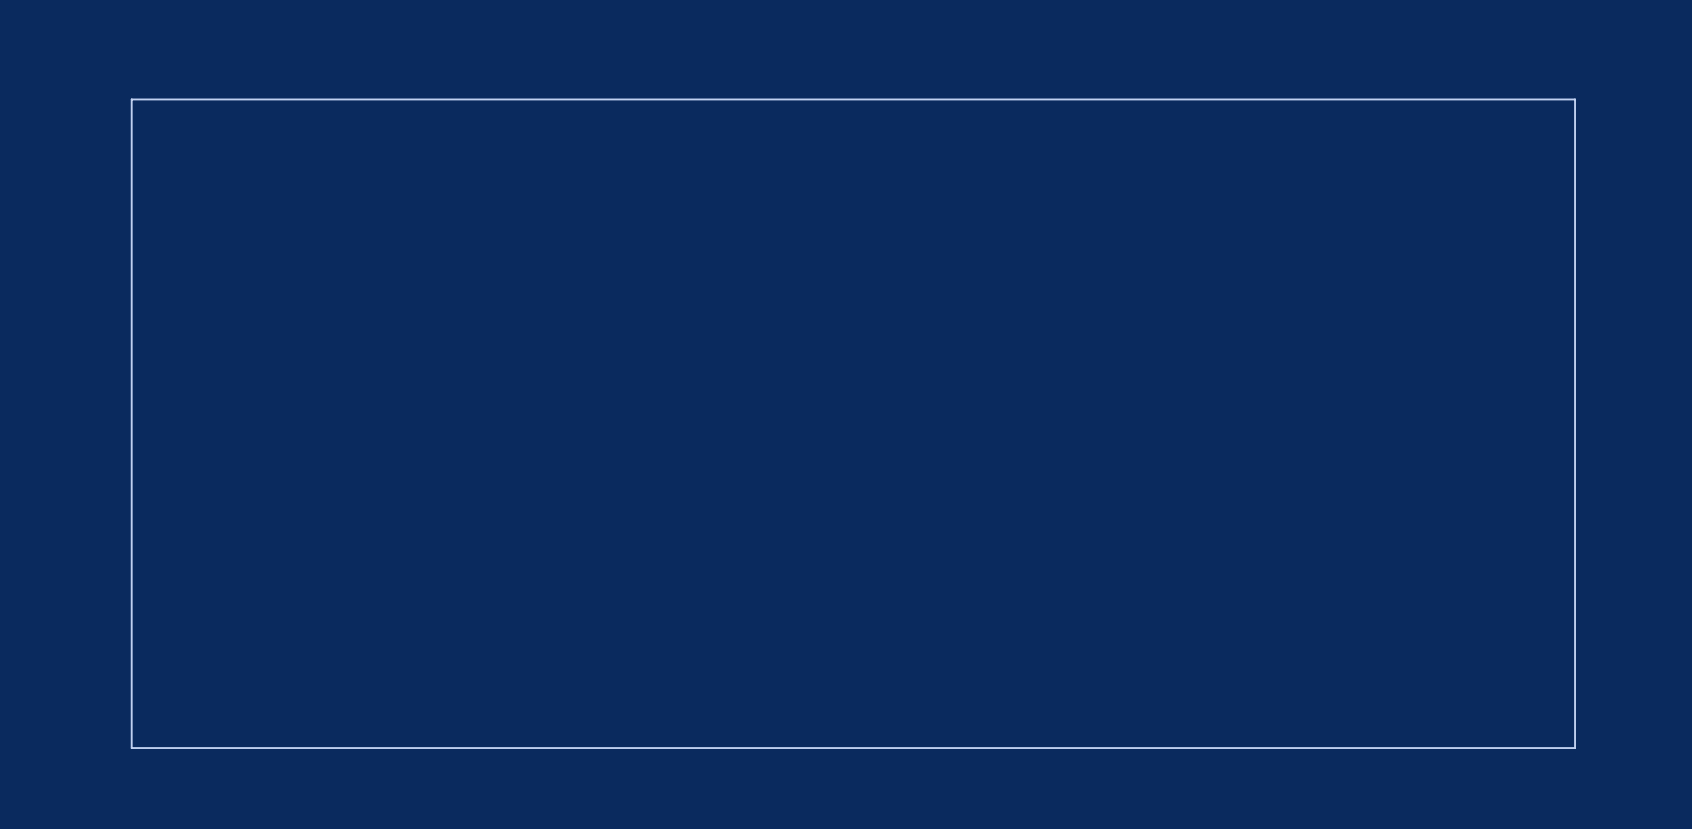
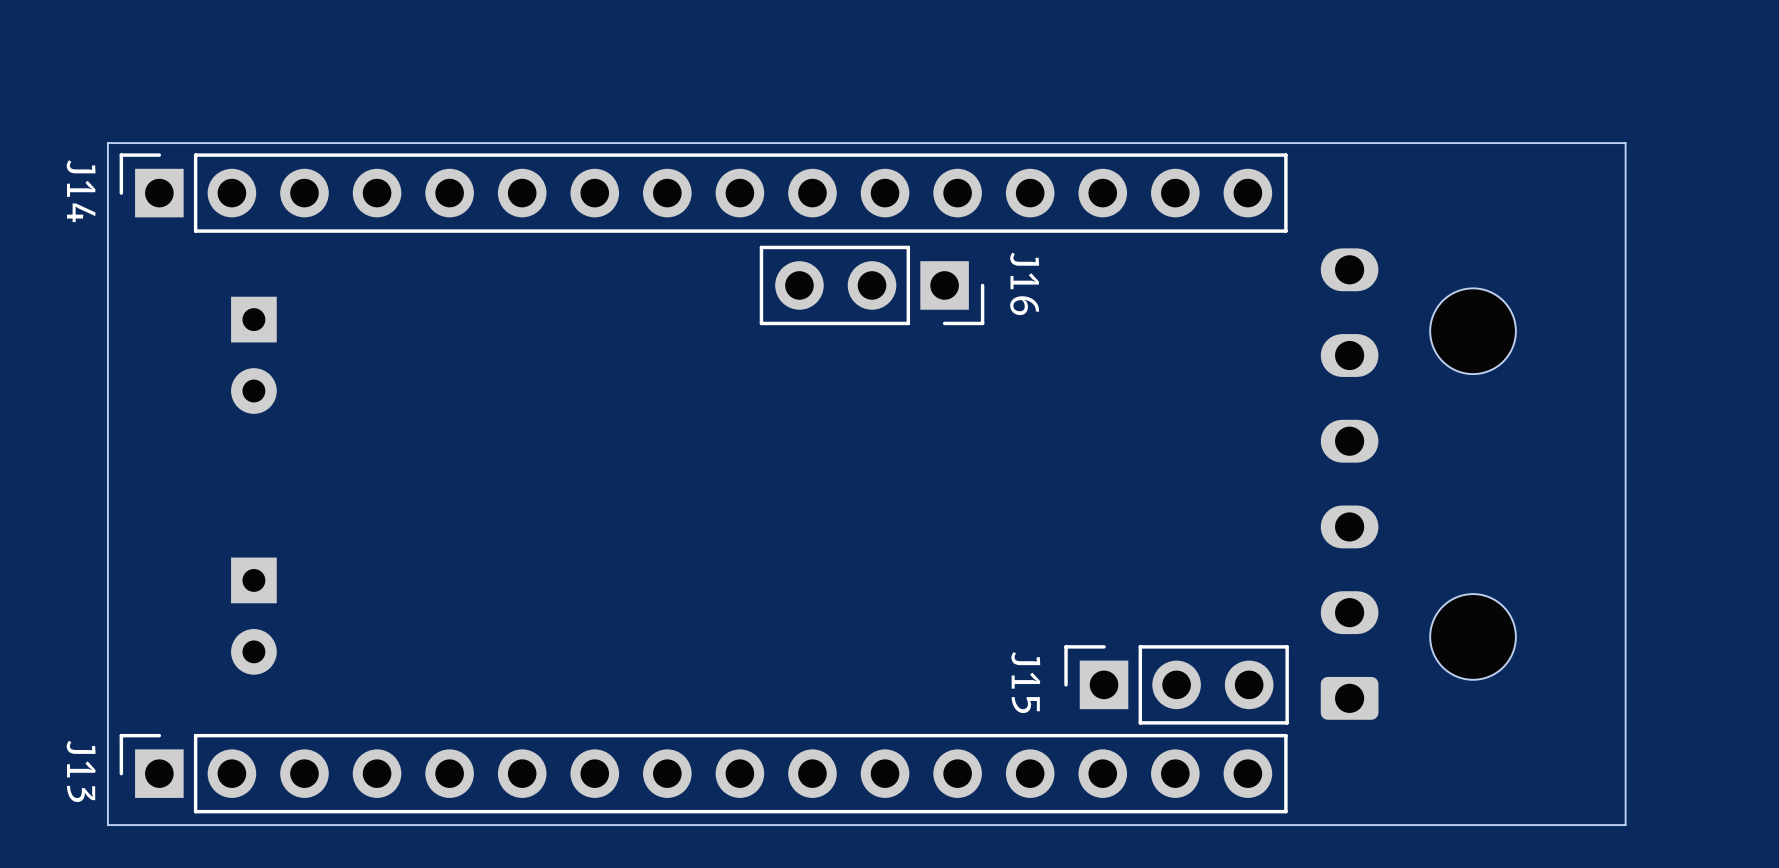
J14: none -> (703, 193)
J16: none -> (872, 285)
part: none -> (253, 355)
part: none -> (1418, 484)
part: none -> (253, 616)
J15: none -> (1176, 684)
J13: none -> (703, 773)

